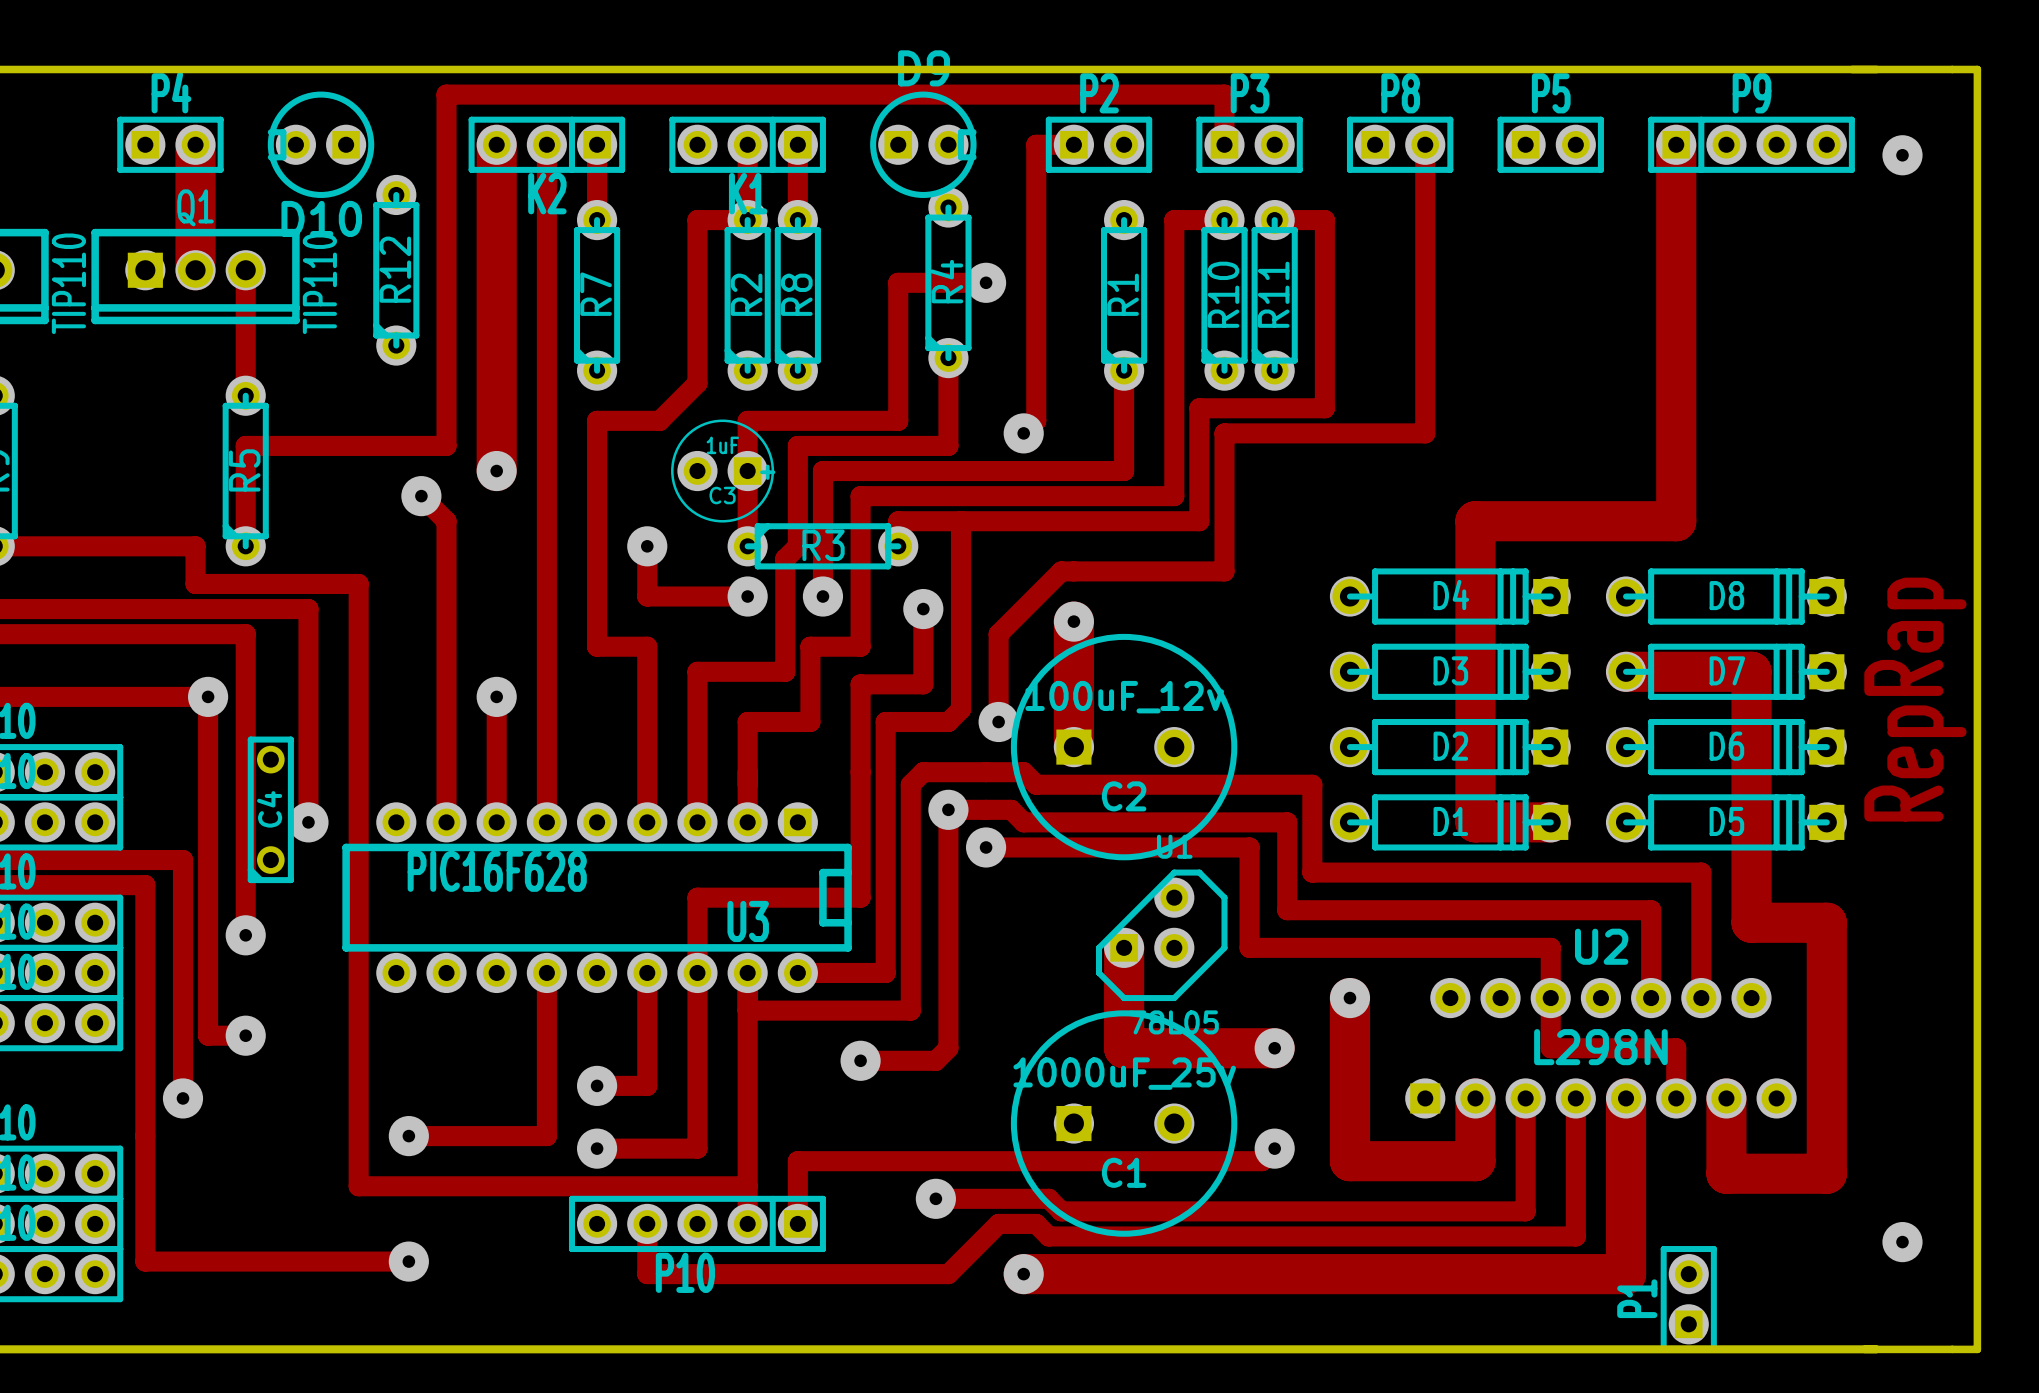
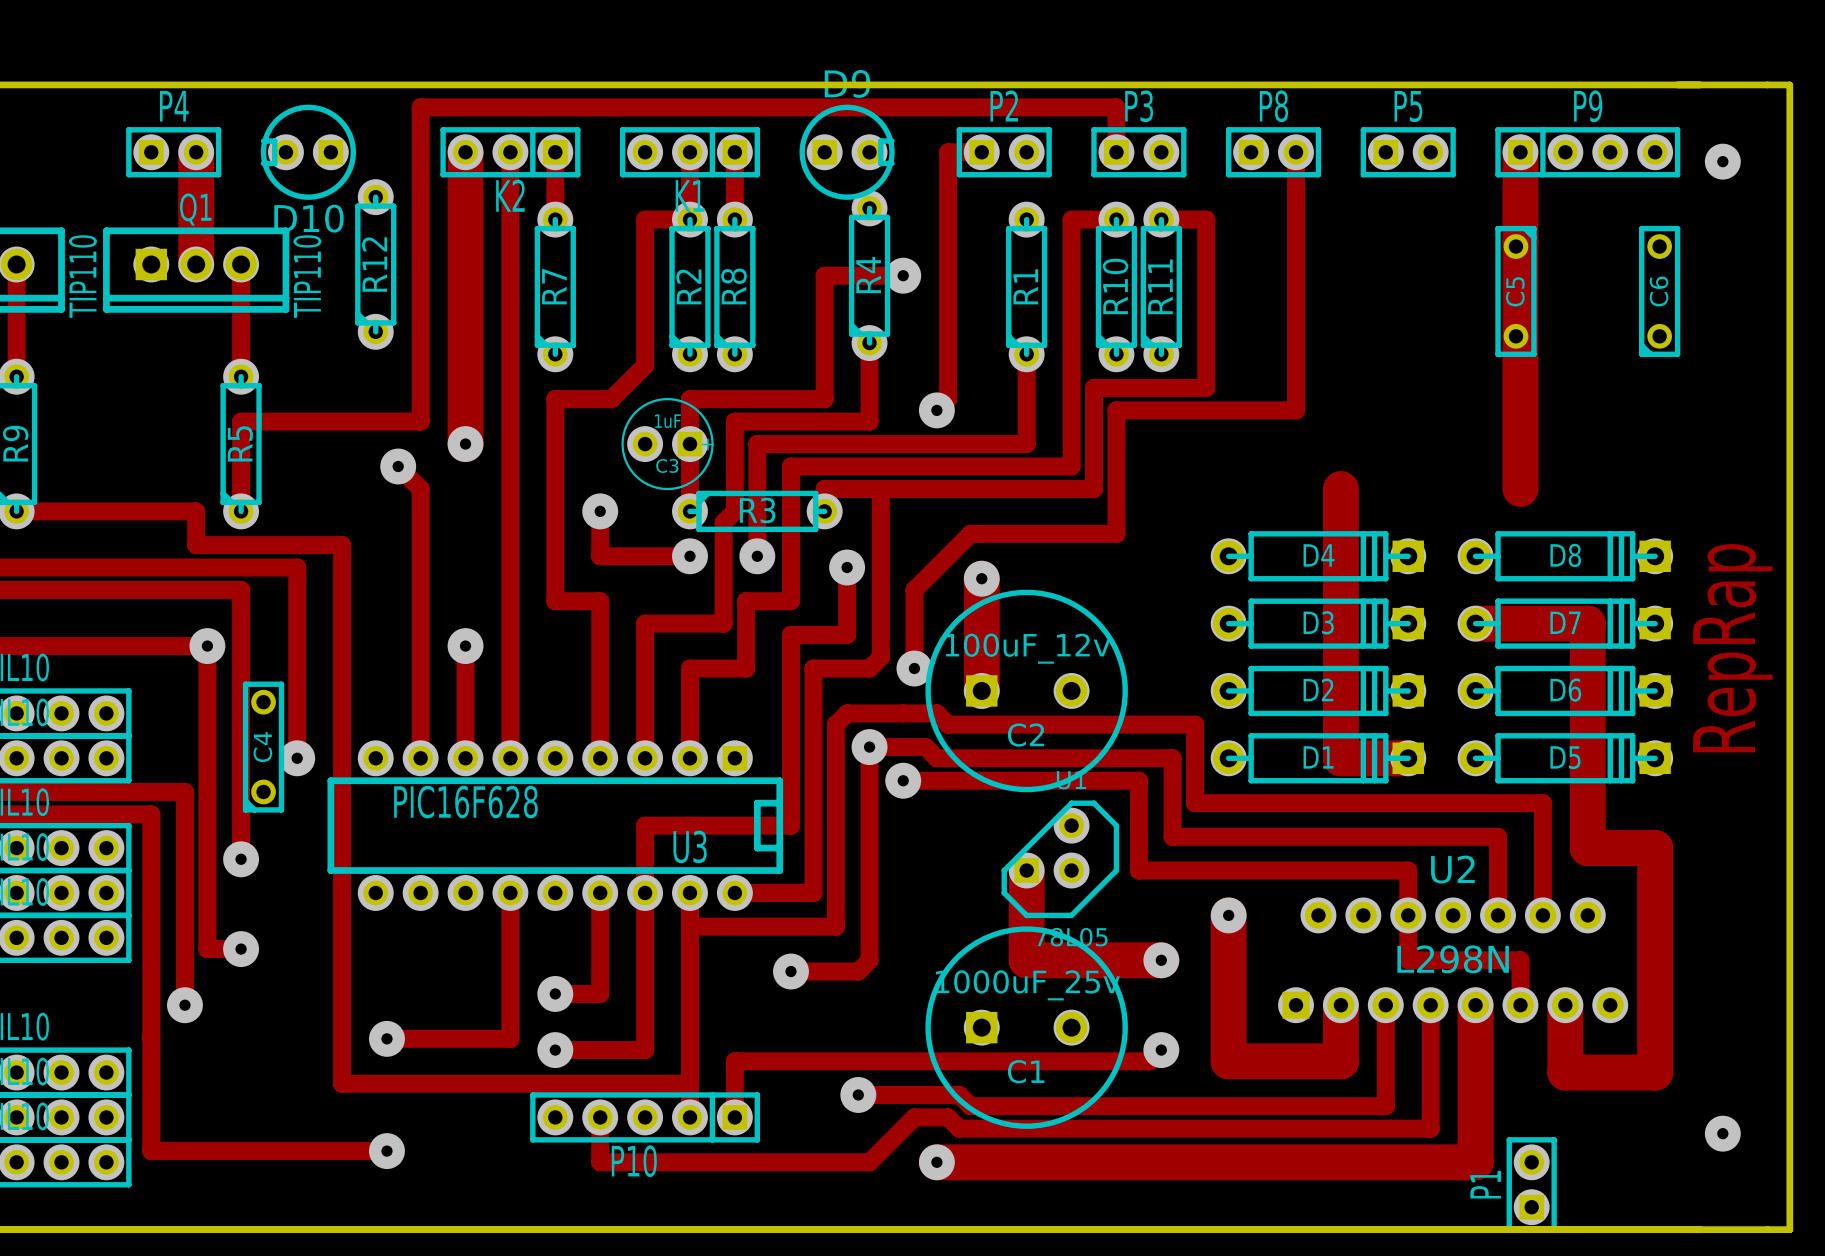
C5: none -> (1515, 291)
C6: none -> (1659, 291)
track: (1676, 521) (1475, 521) (1676, 521) -> none

